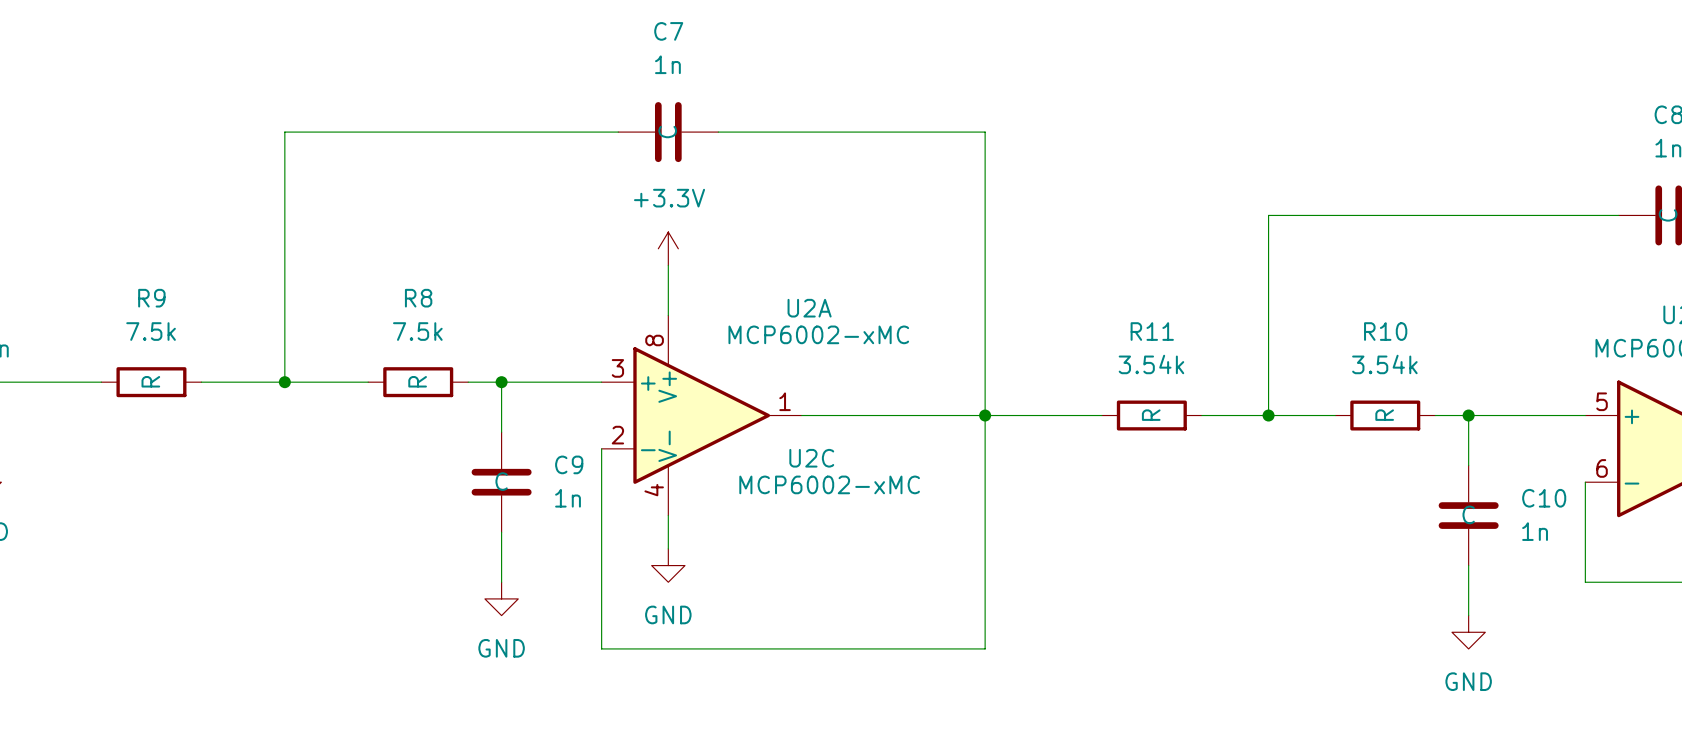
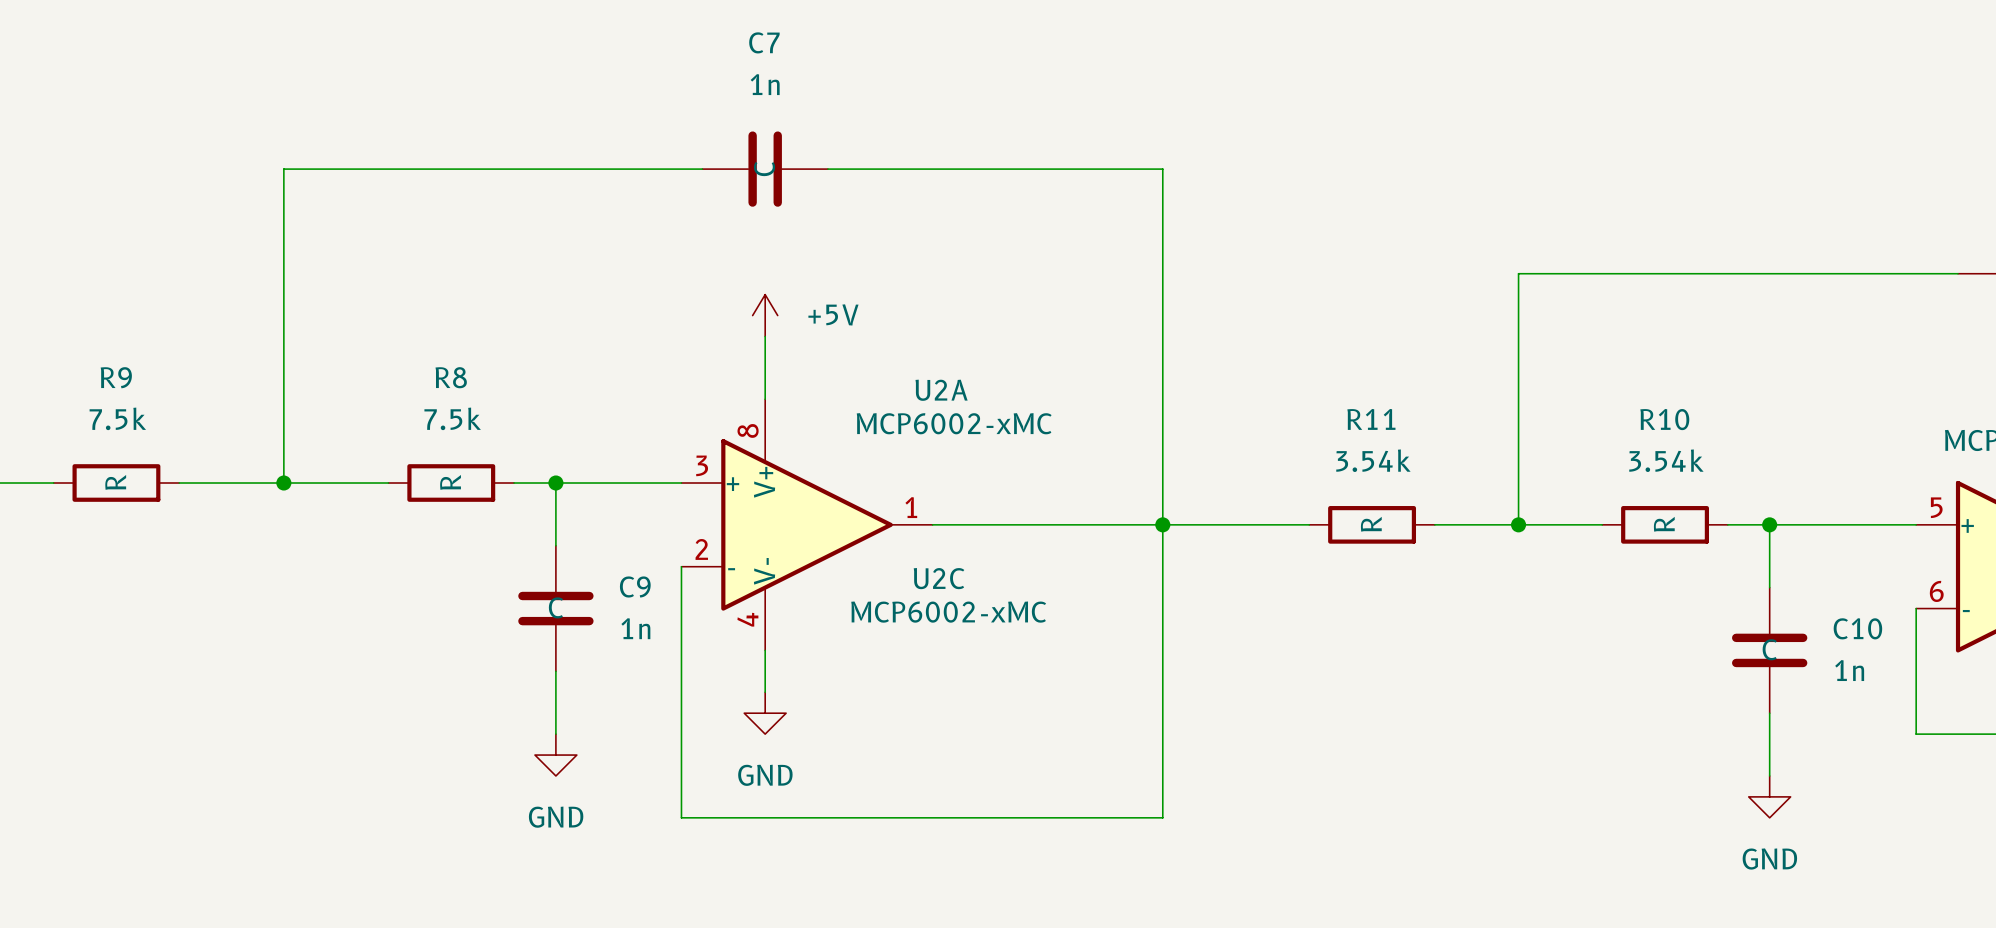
power symbol: +3.3V (668, 248) -> +5V (765, 315)

